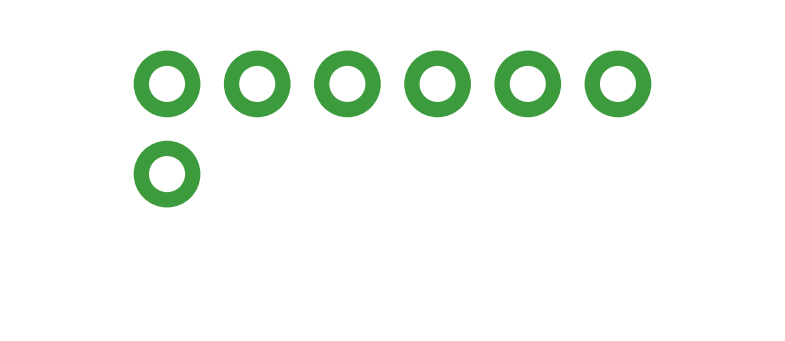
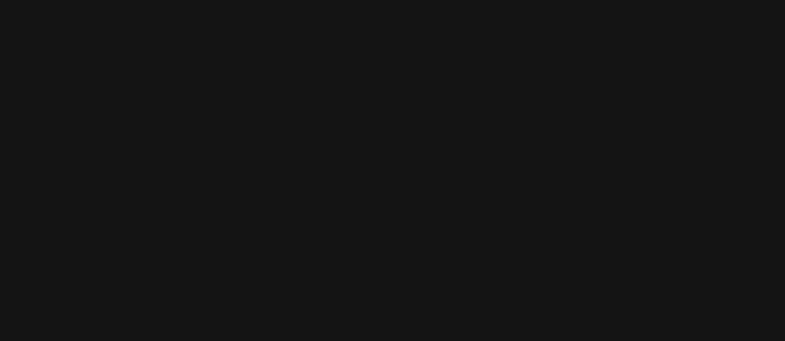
part: (437, 83) -> none
part: (167, 129) -> none

